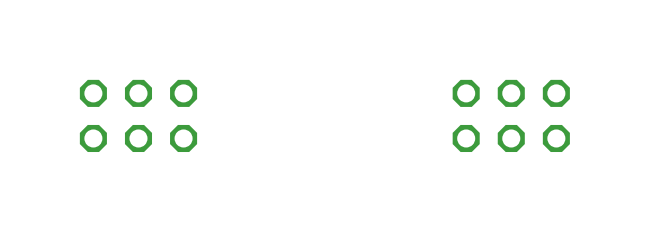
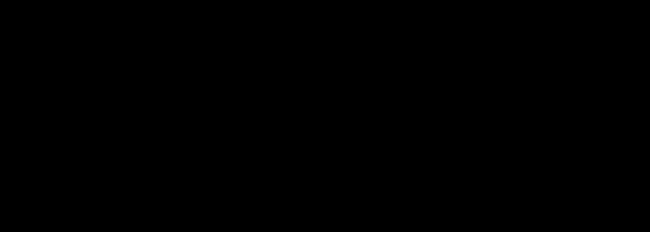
part: (138, 115) -> none
part: (511, 115) -> none

